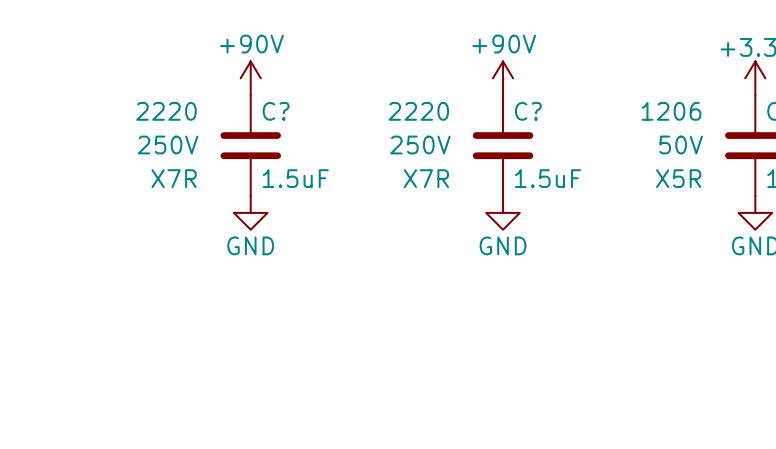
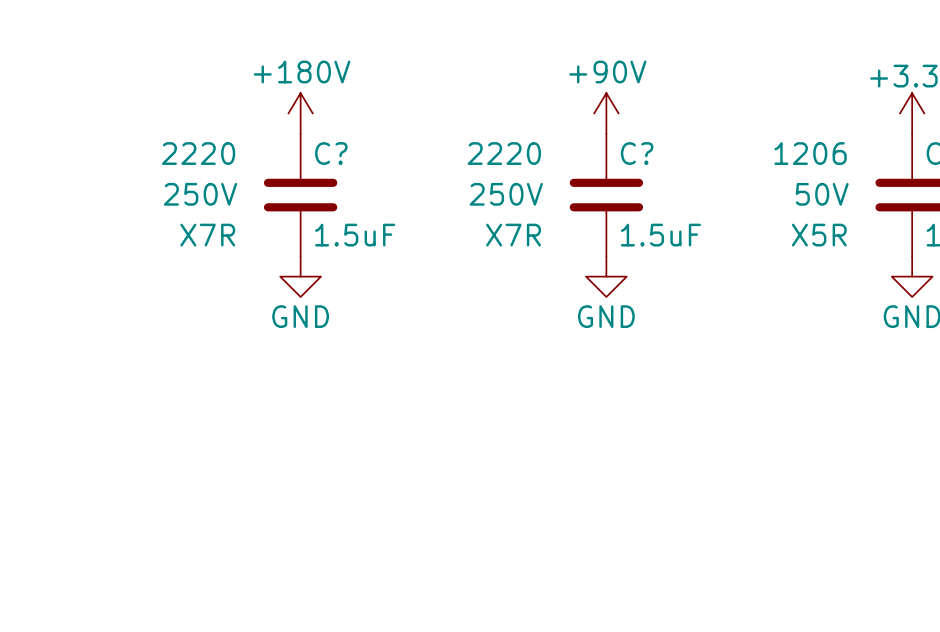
power symbol: +90V (250, 78) -> +180V (300, 113)

